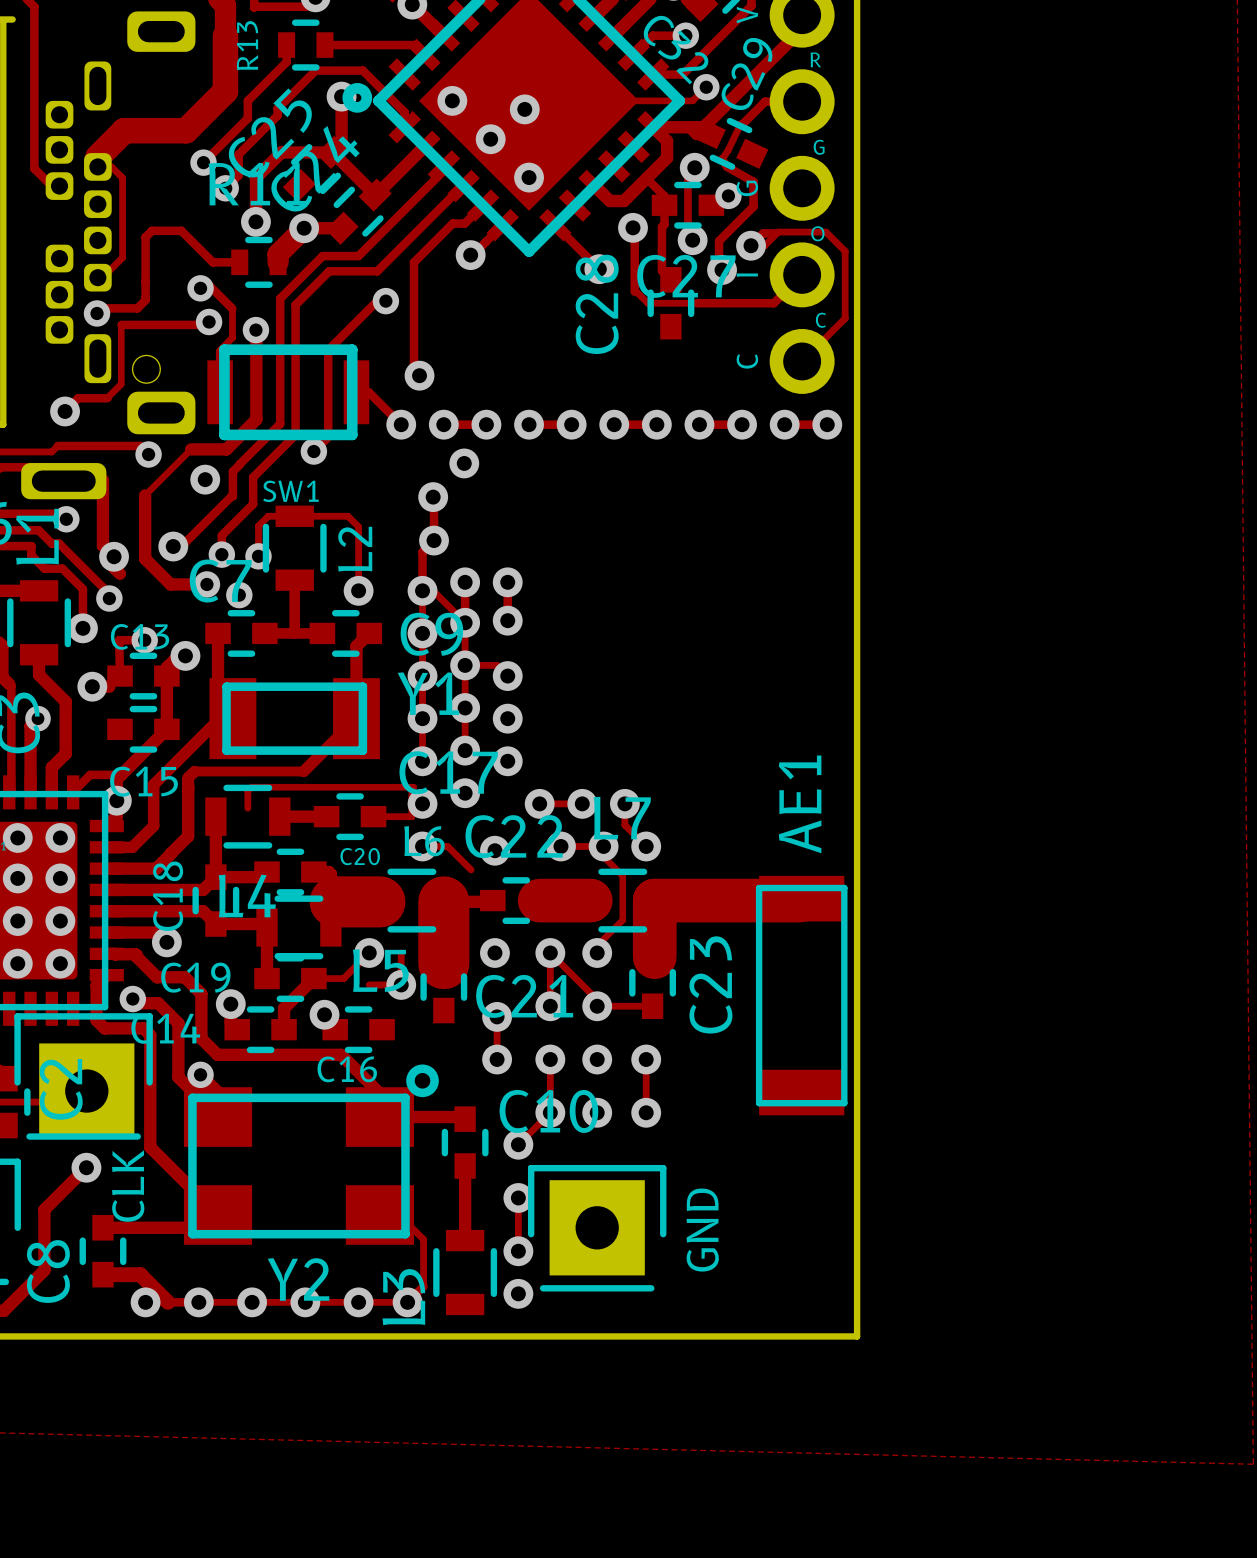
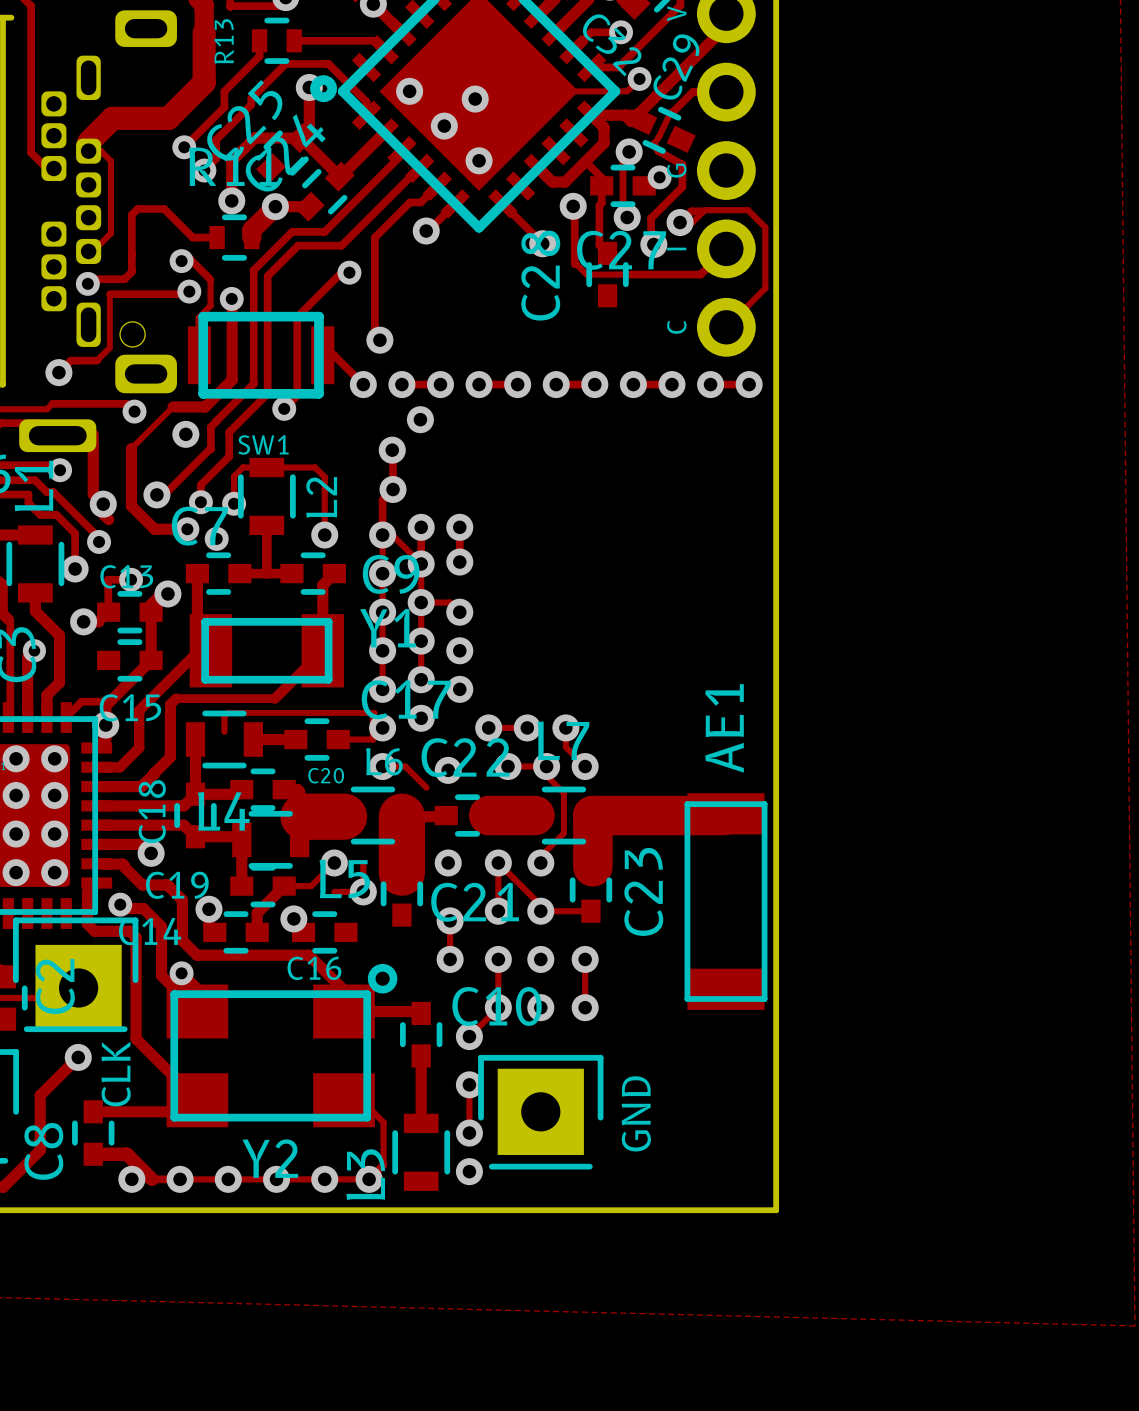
text: R (815, 59) -> none
text: G (819, 147) -> none
text: O (817, 233) -> none
text: C (820, 320) -> none

